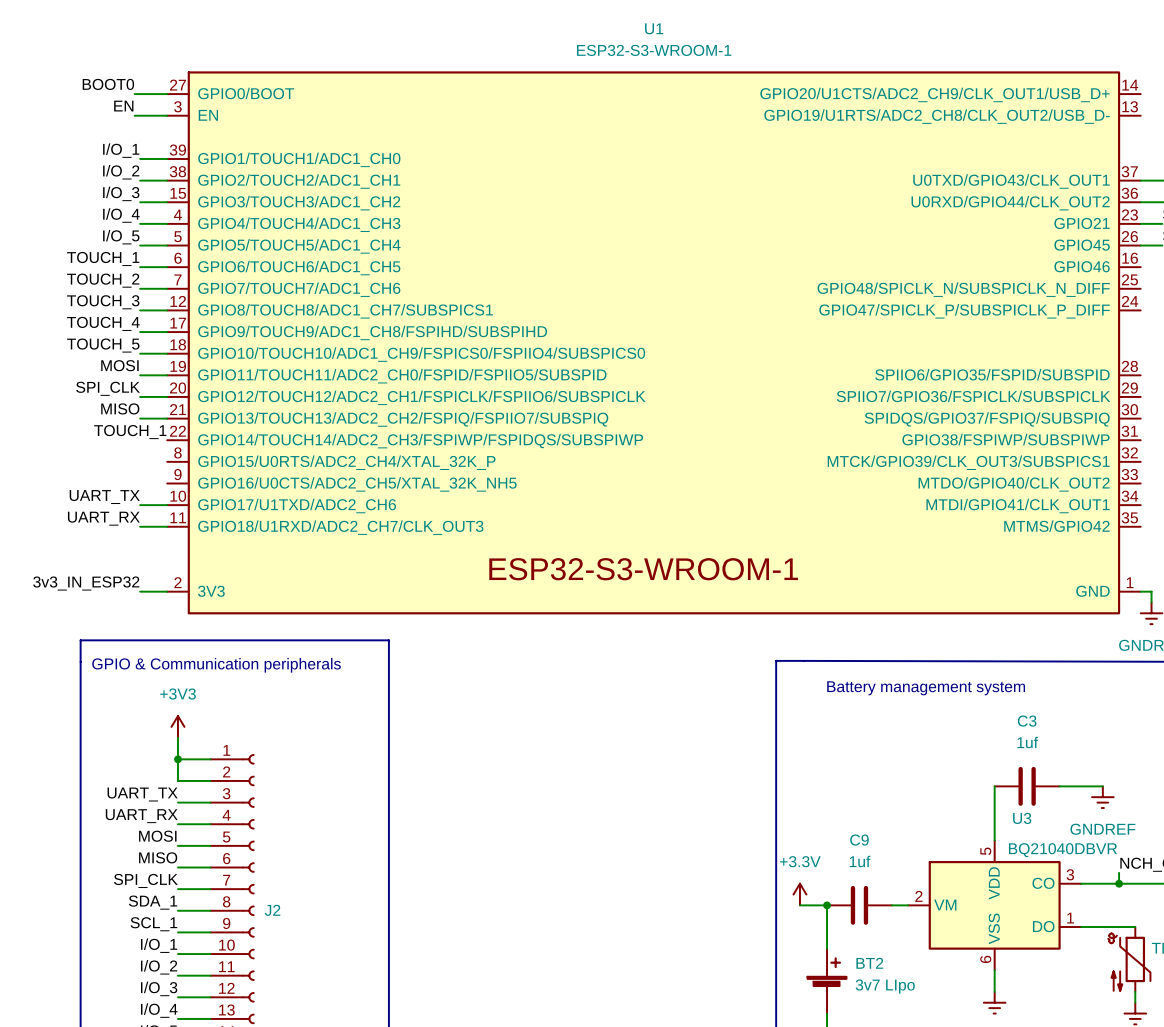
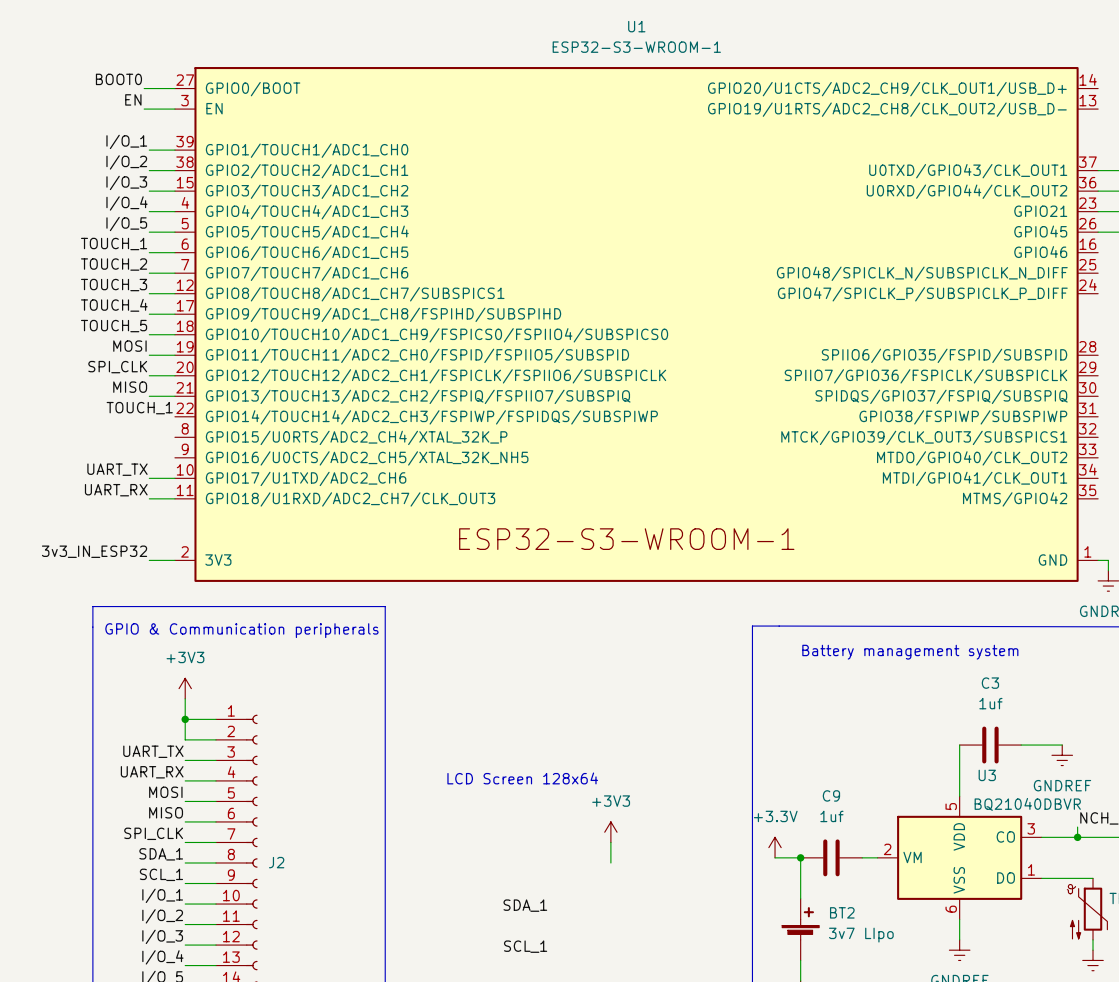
text: none -> LCD Screen 128x64 (522, 778)
power symbol: none -> +3V3 (610, 832)
wire: none -> (610, 842) (610, 862)
label: none -> SDA_1 (525, 905)
label: none -> SCL_1 (525, 946)

